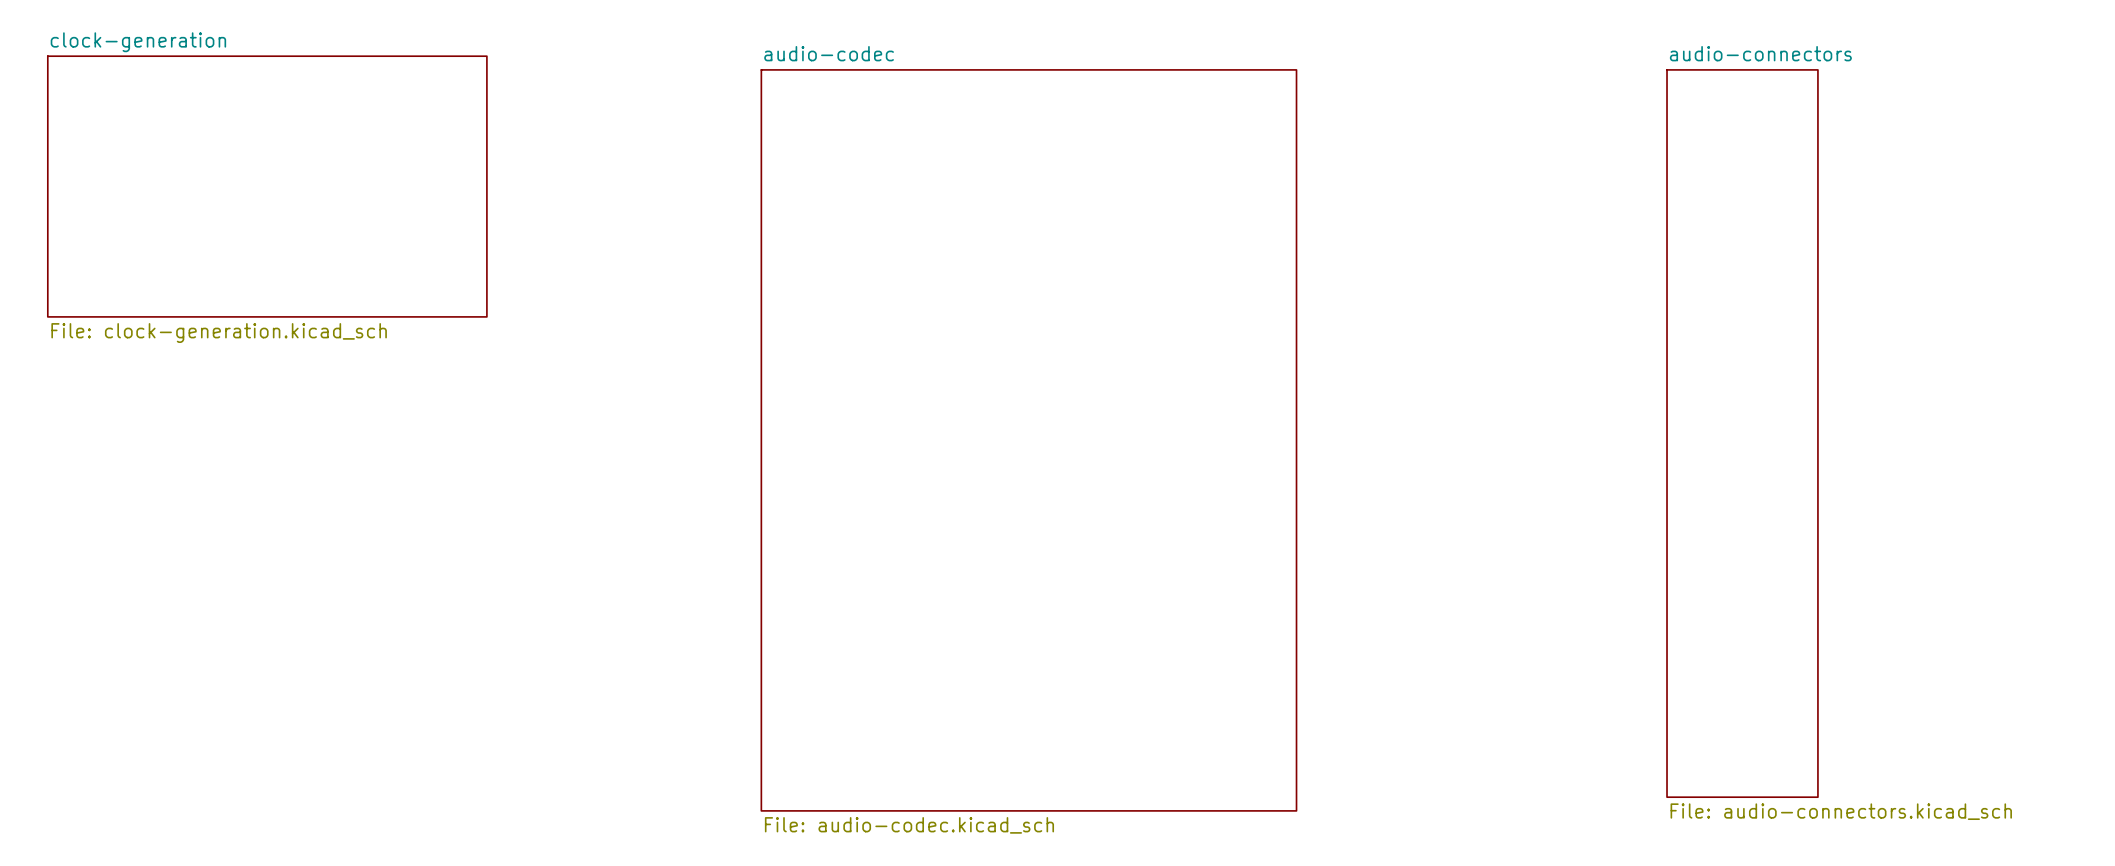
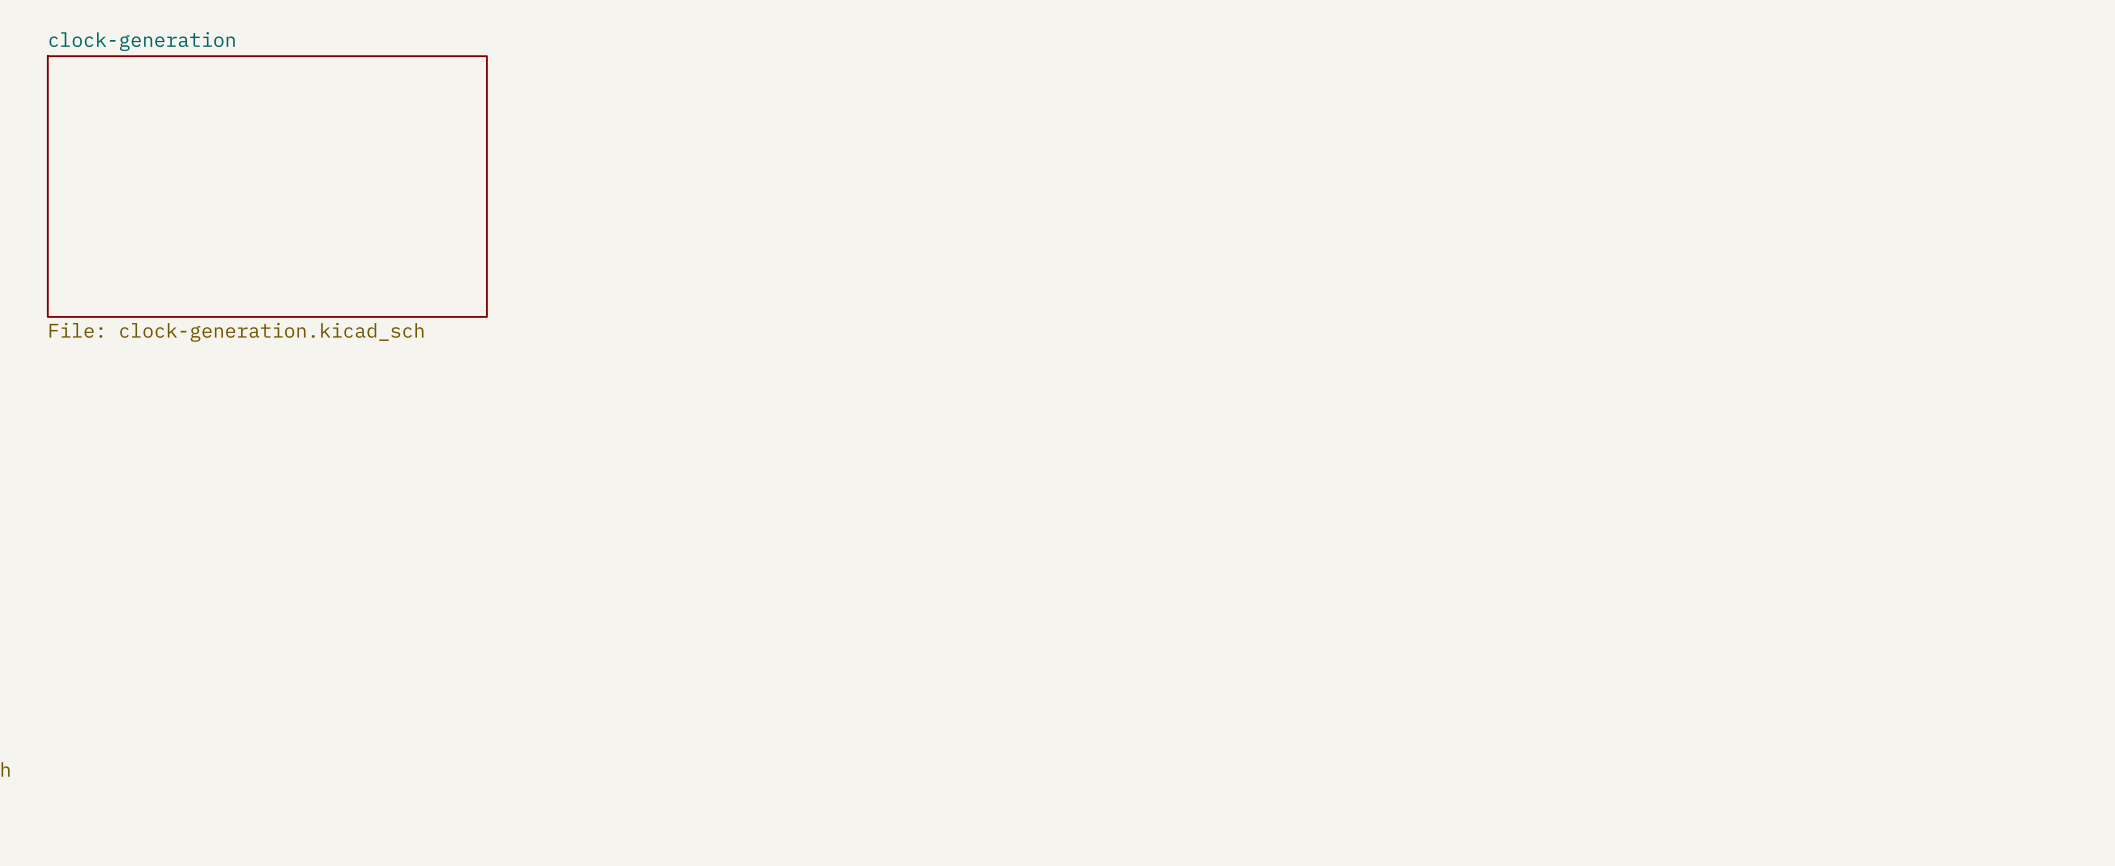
sheet audio-connectors: File: audio-connectors.kicad_sch (1742, 433) -> none
sheet audio-codec: File: audio-codec.kicad_sch (1028, 440) -> none

